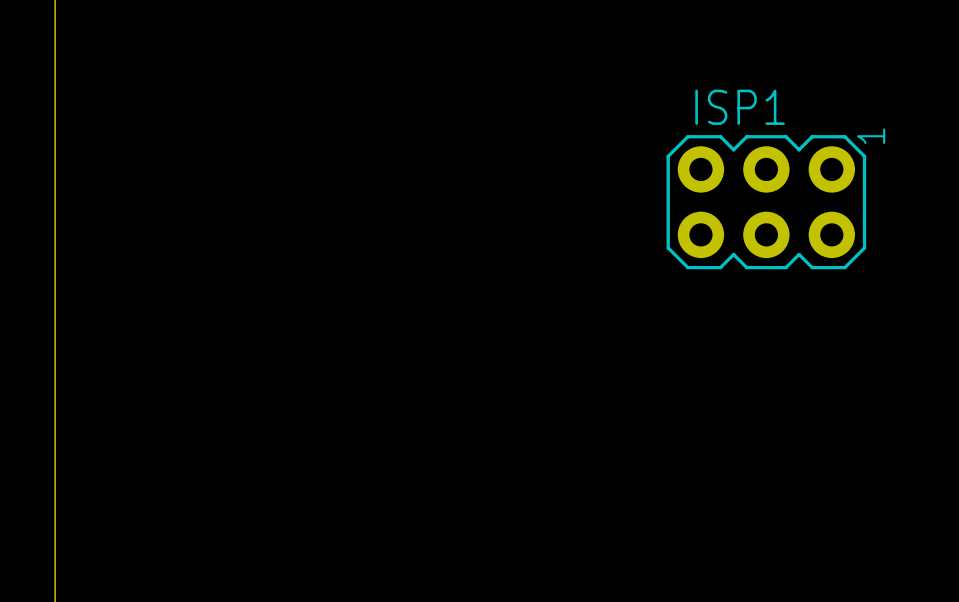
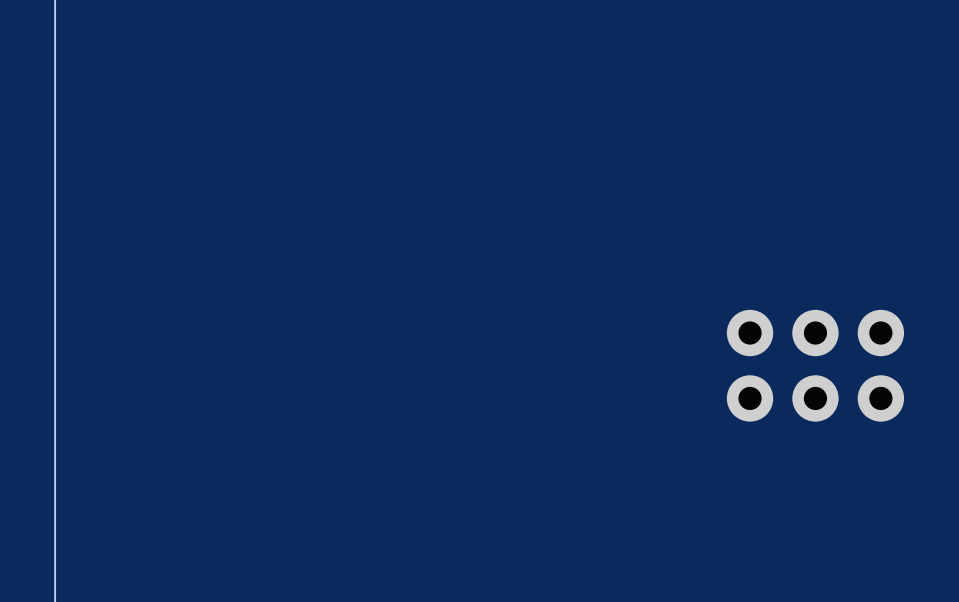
ISP1 side: bottom (766, 202) -> top (815, 365)

